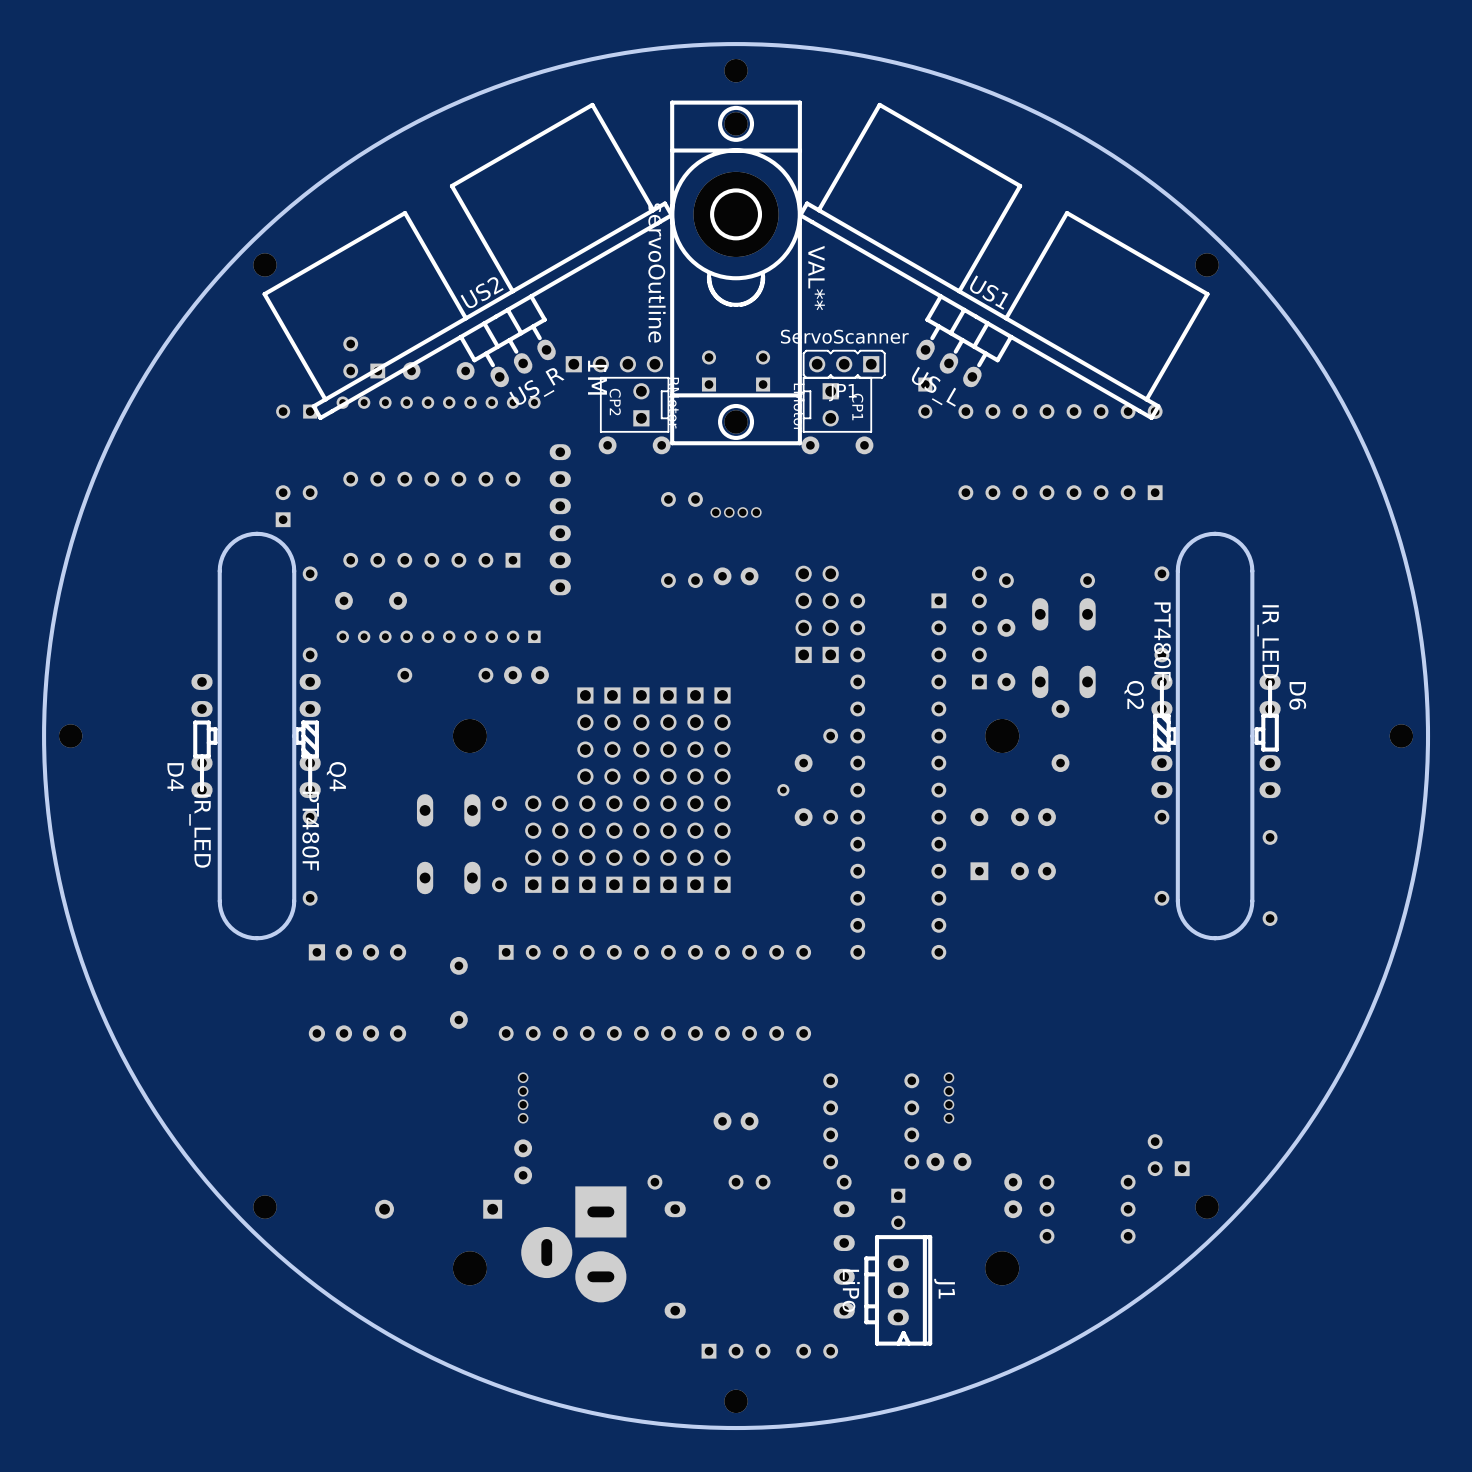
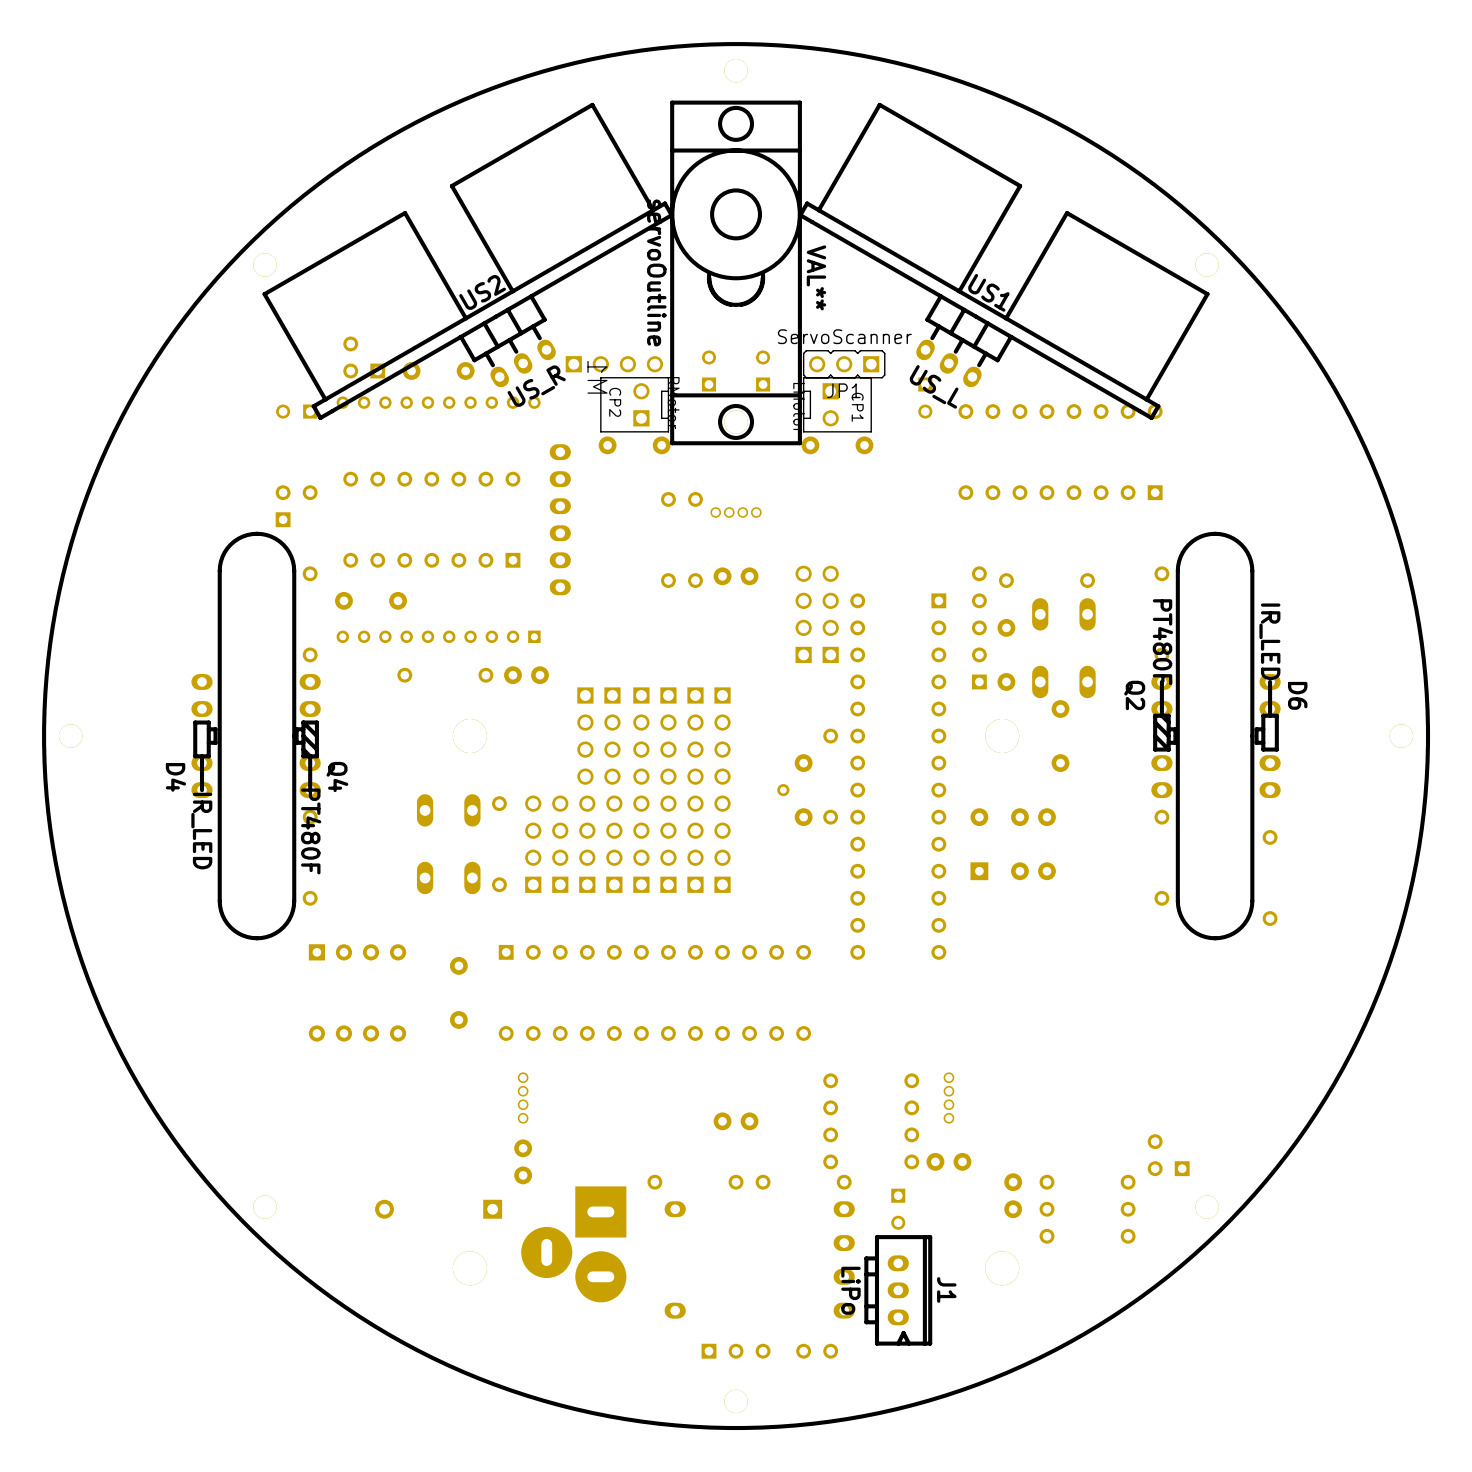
part: (736, 123) -> none
part: (736, 214) -> none

